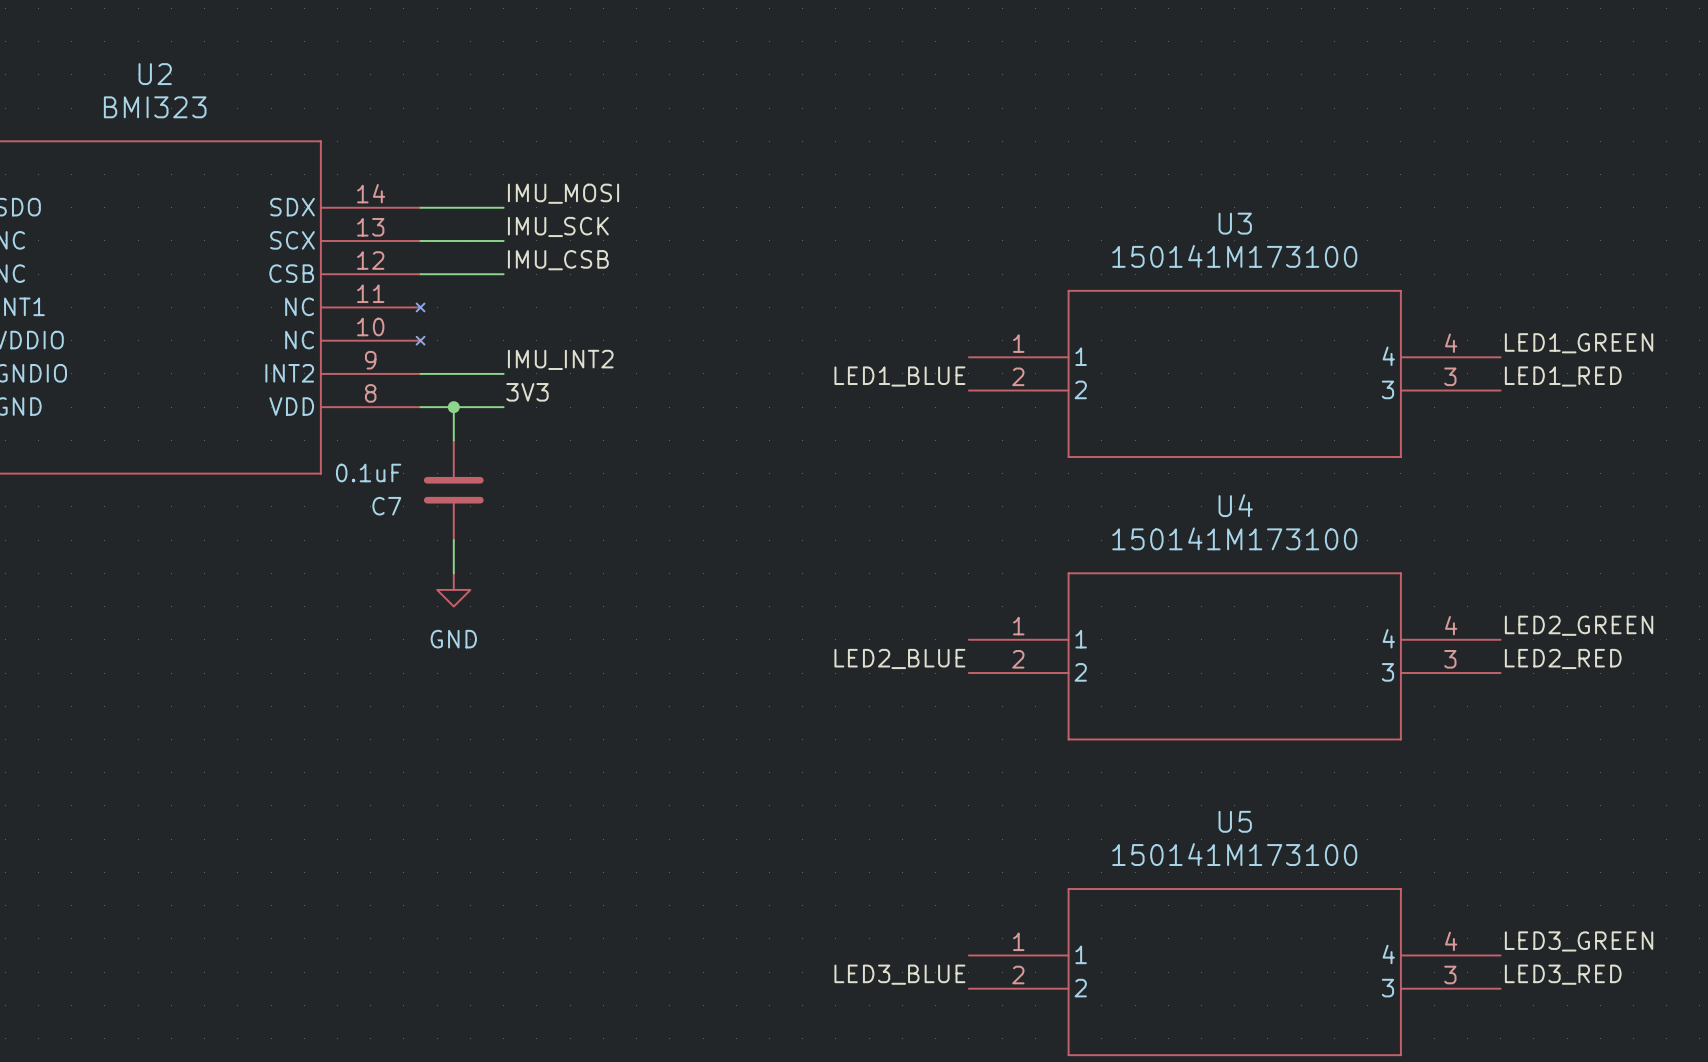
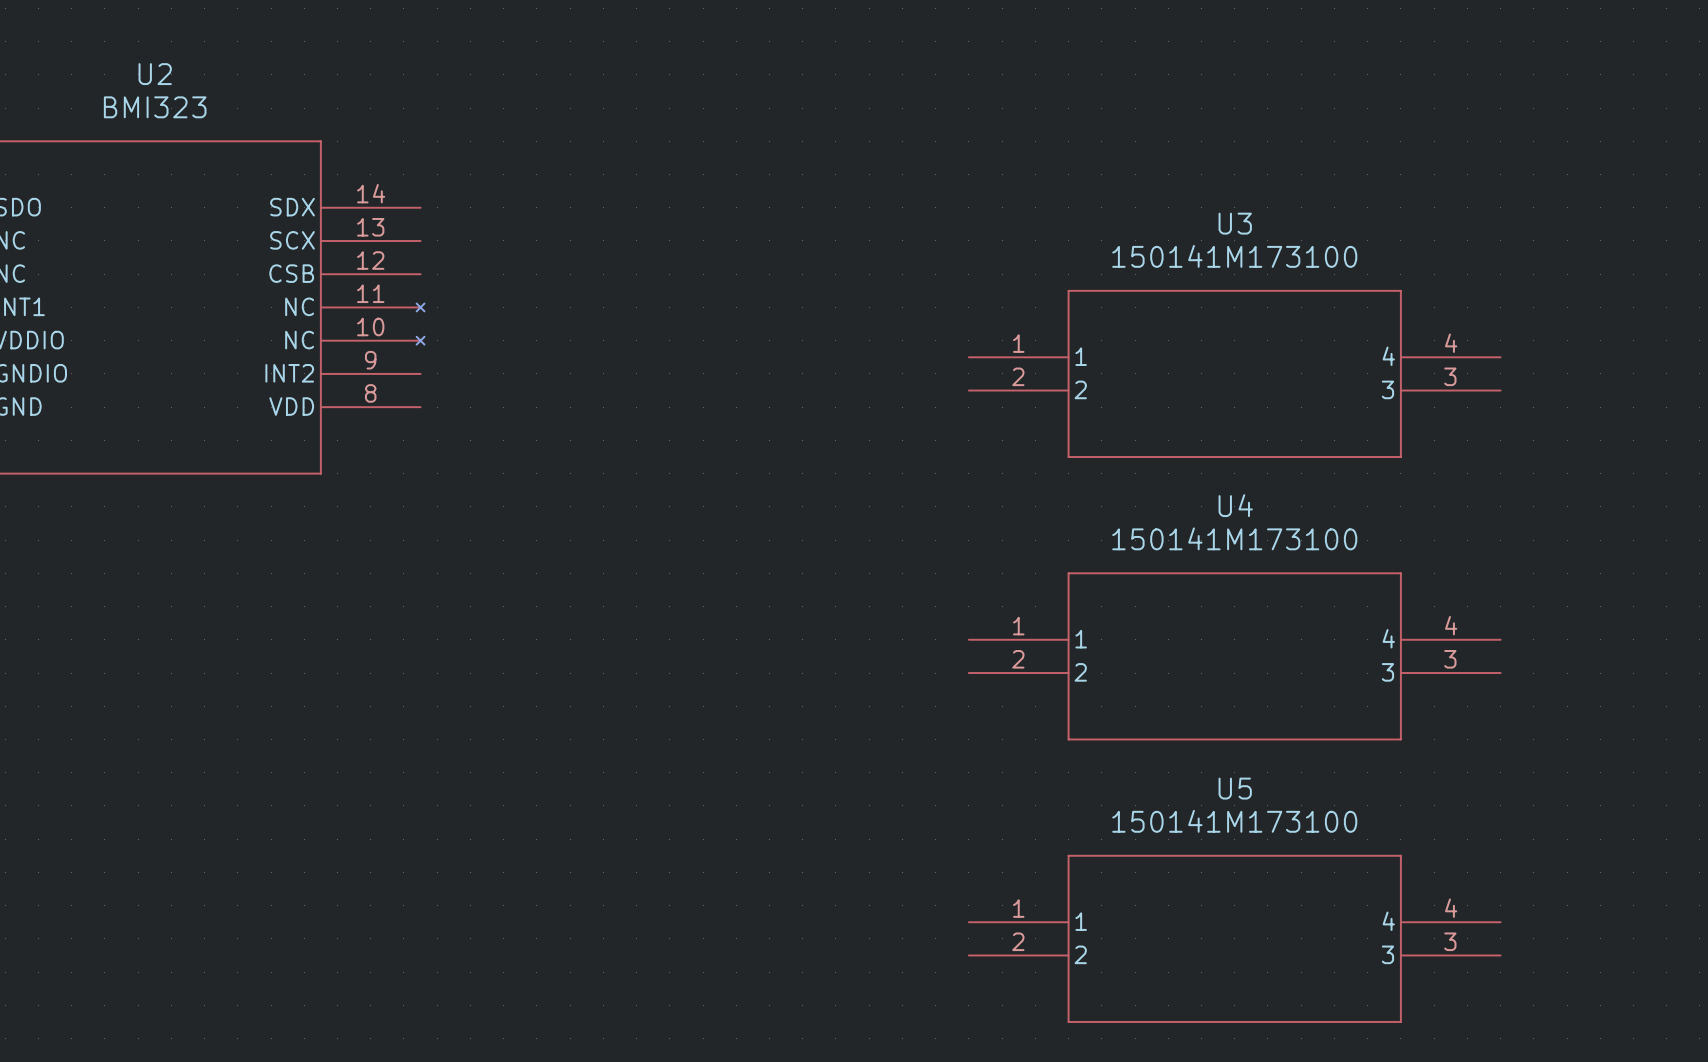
label: IMU_MOSI (563, 193) -> none
wire: (420, 207) (503, 207) -> none
label: IMU_SCK (558, 226) -> none
wire: (420, 240) (503, 240) -> none
label: IMU_CSB (558, 260) -> none
wire: (420, 274) (503, 274) -> none
label: LED1_GREEN (1579, 343) -> none
label: IMU_INT2 (560, 359) -> none
wire: (420, 373) (503, 373) -> none
label: LED1_BLUE (899, 376) -> none
label: LED1_RED (1563, 376) -> none
label: 3V3 (527, 392) -> none
wire: (420, 407) (503, 407) -> none
wire: (453, 407) (453, 440) -> none
junction: (453, 407) -> none
C7: 0.1uF (453, 490) -> none
wire: (453, 540) (453, 573) -> none
power symbol: GND (453, 589) -> none
label: LED2_GREEN (1579, 625) -> none
label: LED2_BLUE (899, 658) -> none
label: LED2_RED (1563, 658) -> none
label: LED3_GREEN (1579, 941) -> none
U5 position: (1234, 972) -> (1234, 938)
label: LED3_BLUE (899, 974) -> none
label: LED3_RED (1563, 974) -> none

